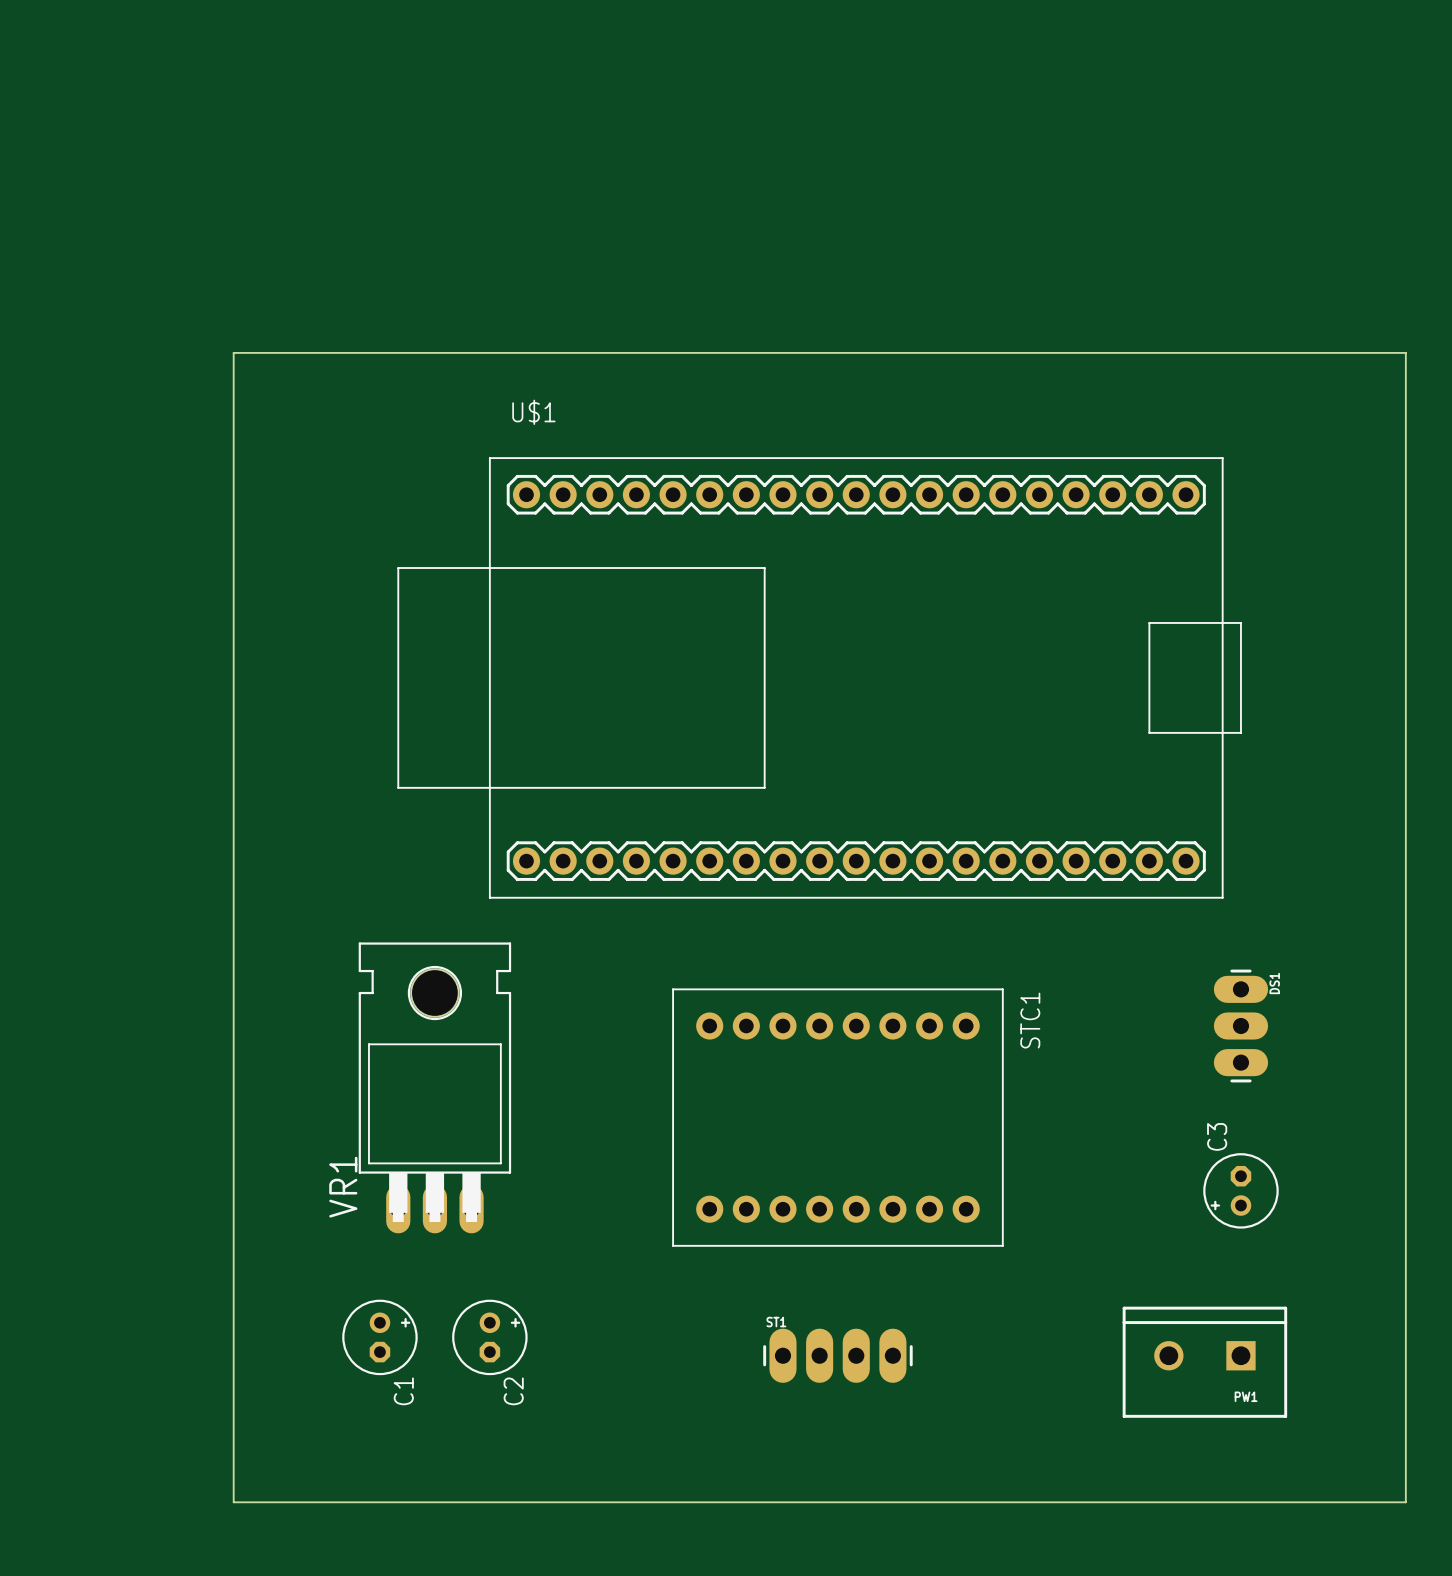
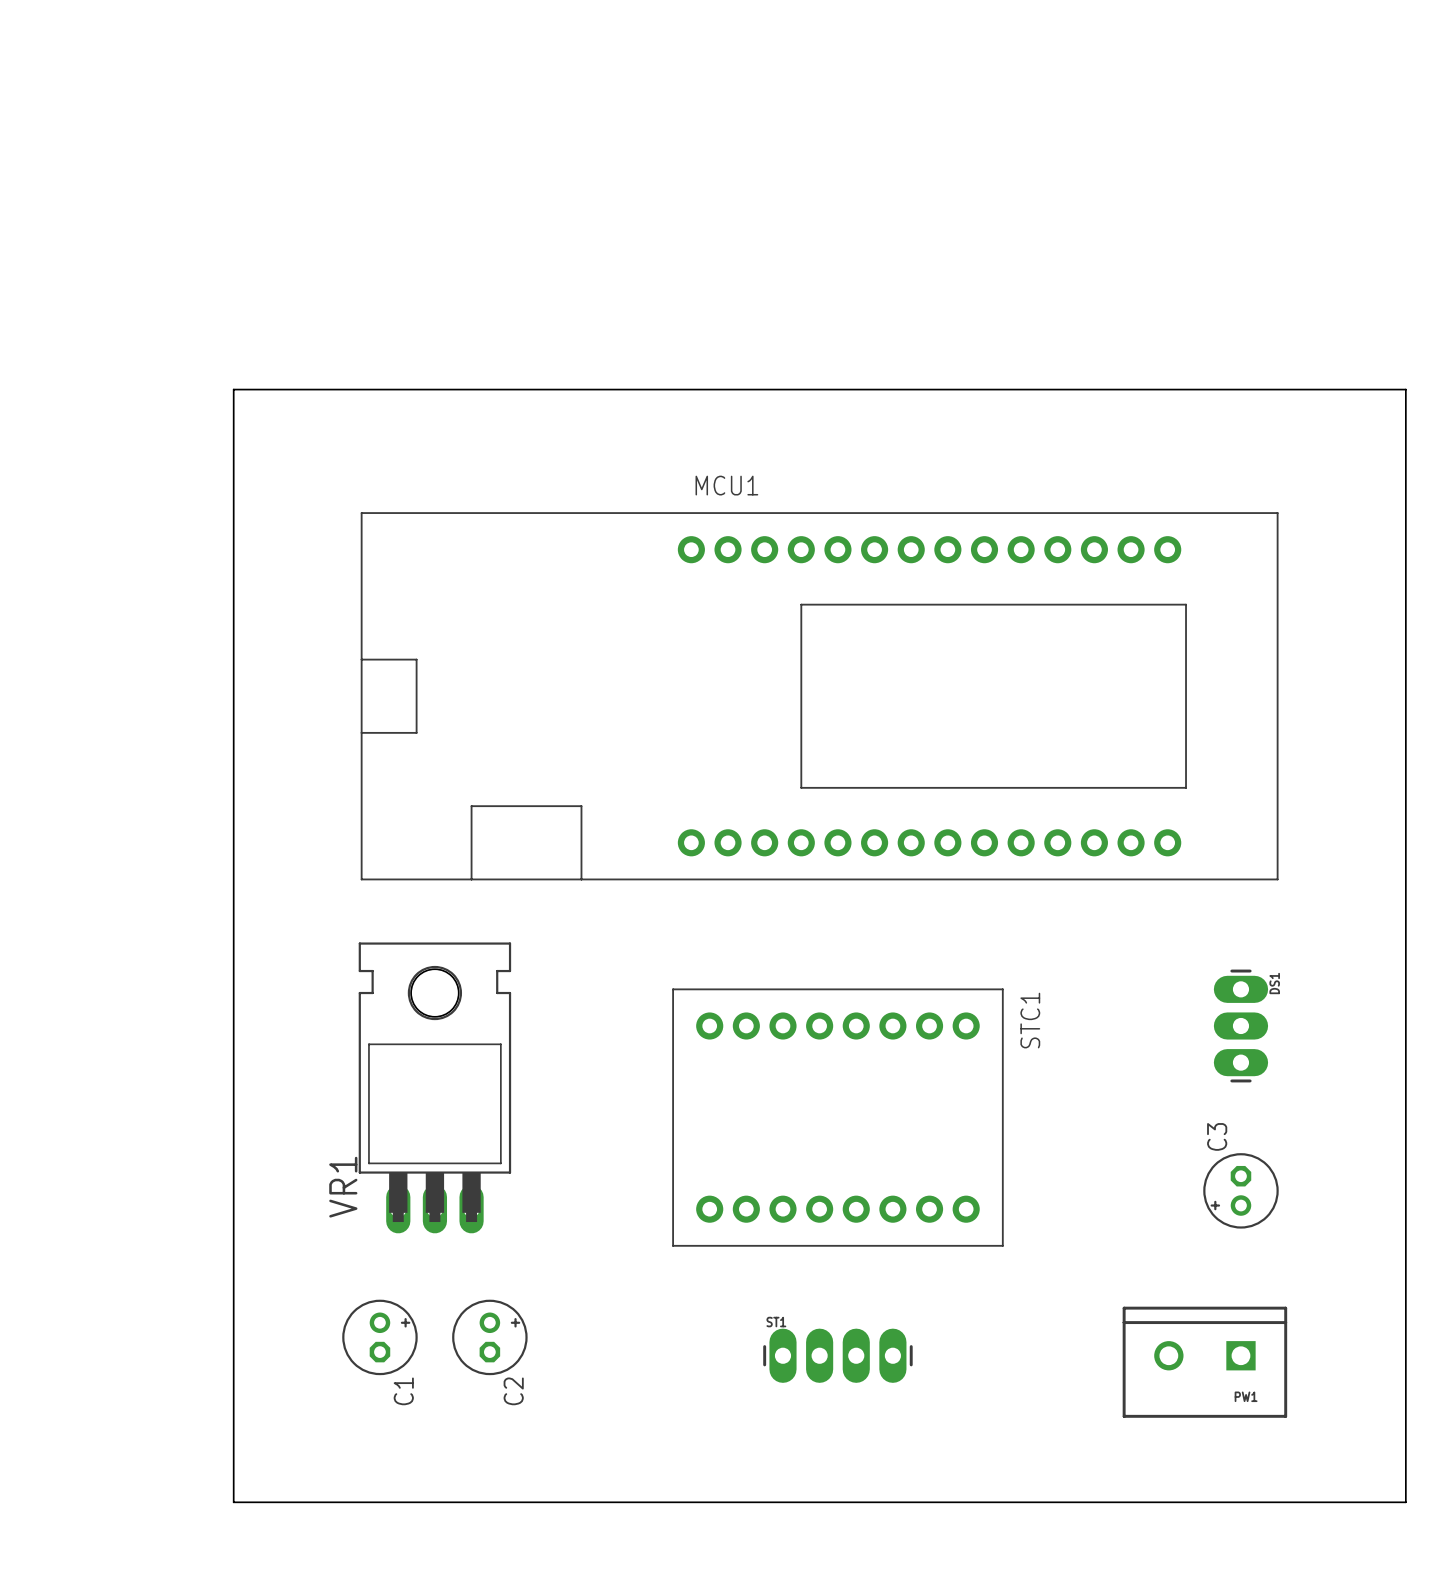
board edge: (1405, 389) (1405, 352) (233, 352) (233, 389) -> (1405, 389) (233, 389)
U$1: (819, 677) -> none
MCU1: none -> (819, 696)

